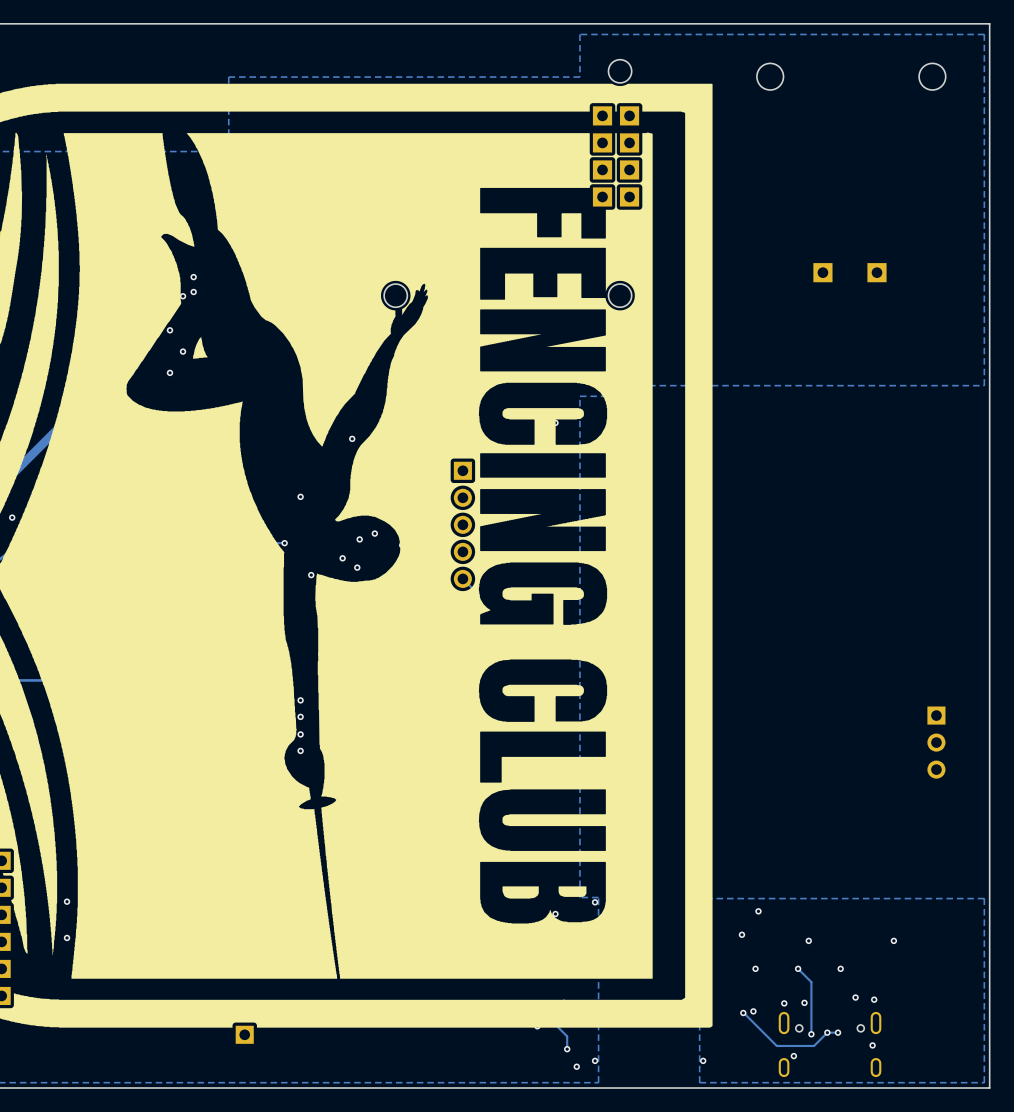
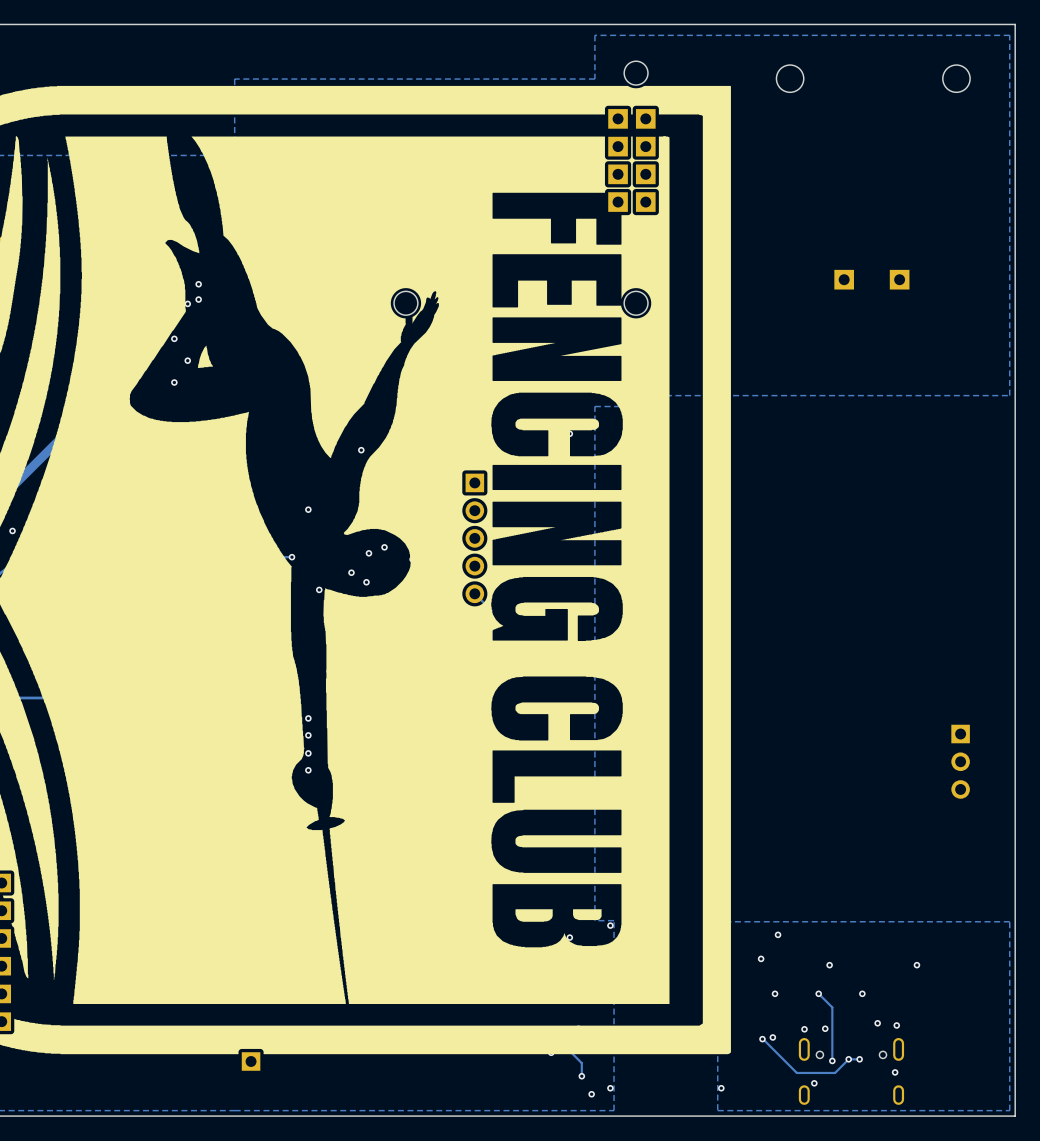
via: (67, 901) -> none
via: (67, 937) -> none

